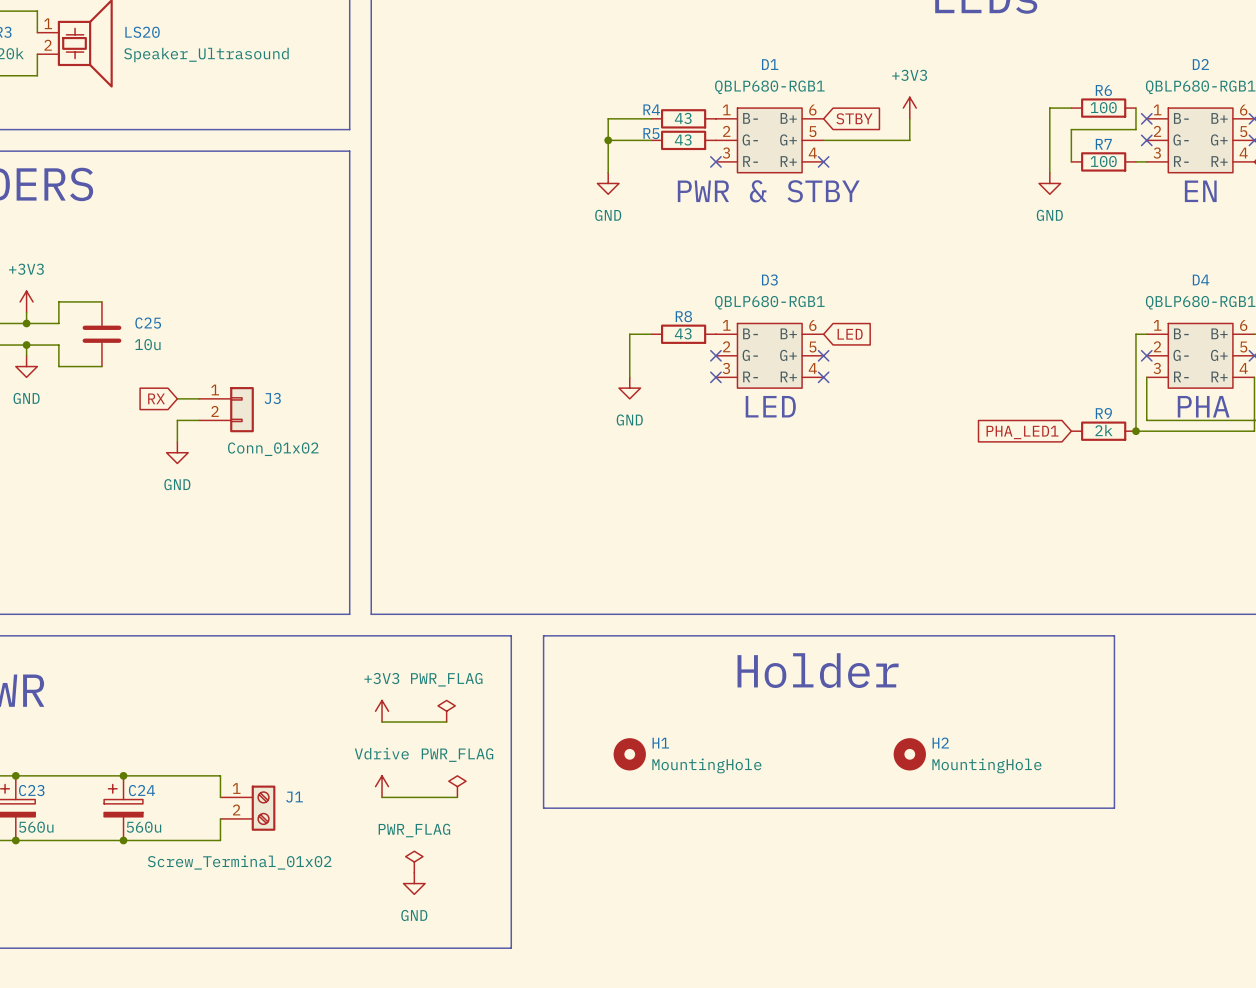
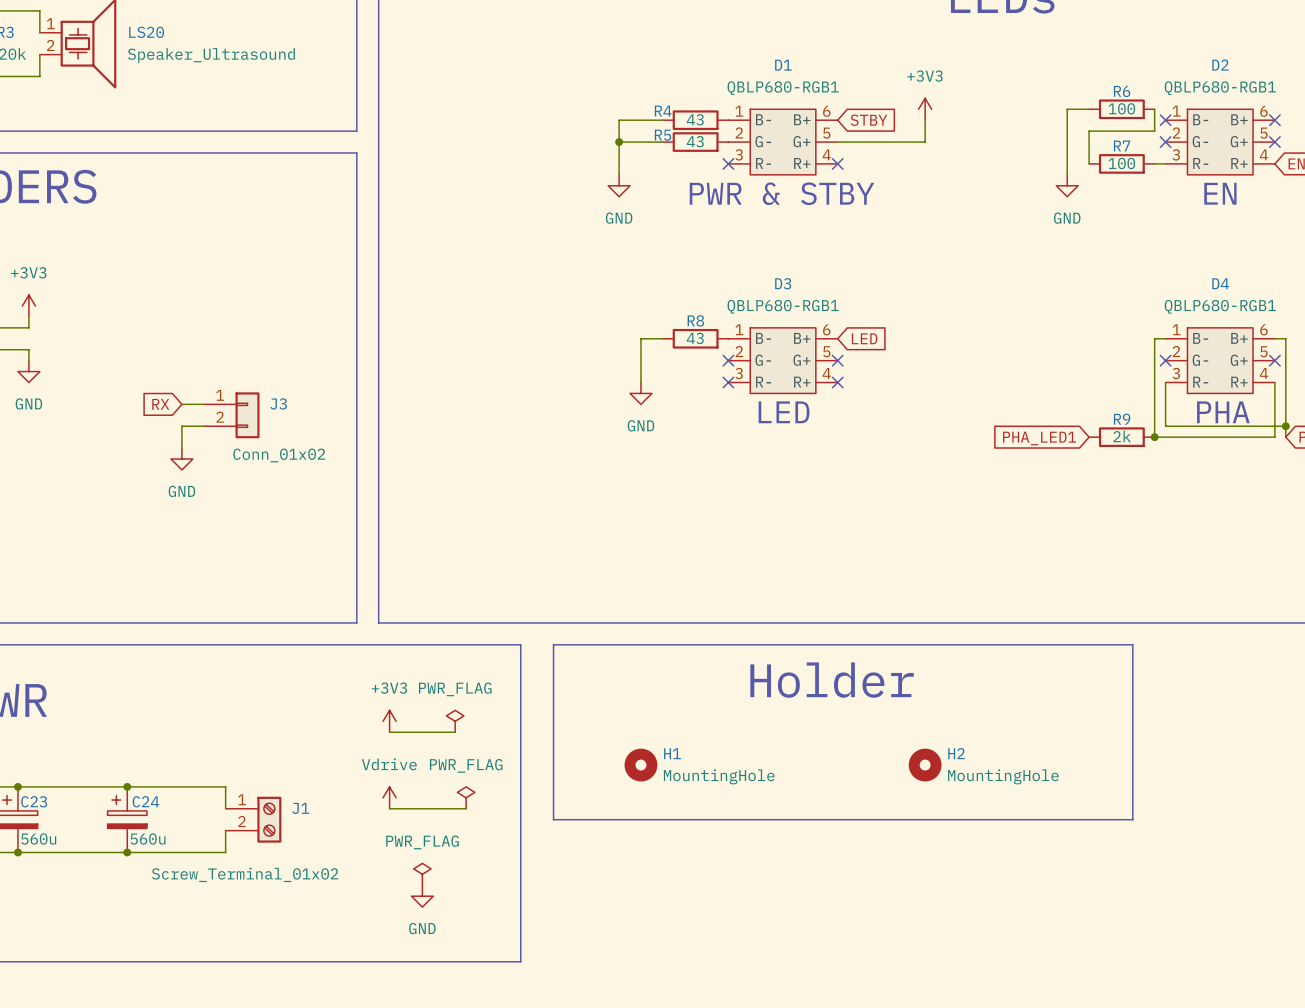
wire: (101, 301) (58, 301) (58, 323) (26, 323) -> none
junction: (26, 323) -> none
C25: 10u (101, 334) -> none
wire: (26, 345) (58, 345) (58, 366) (101, 366) -> none
junction: (26, 345) -> none

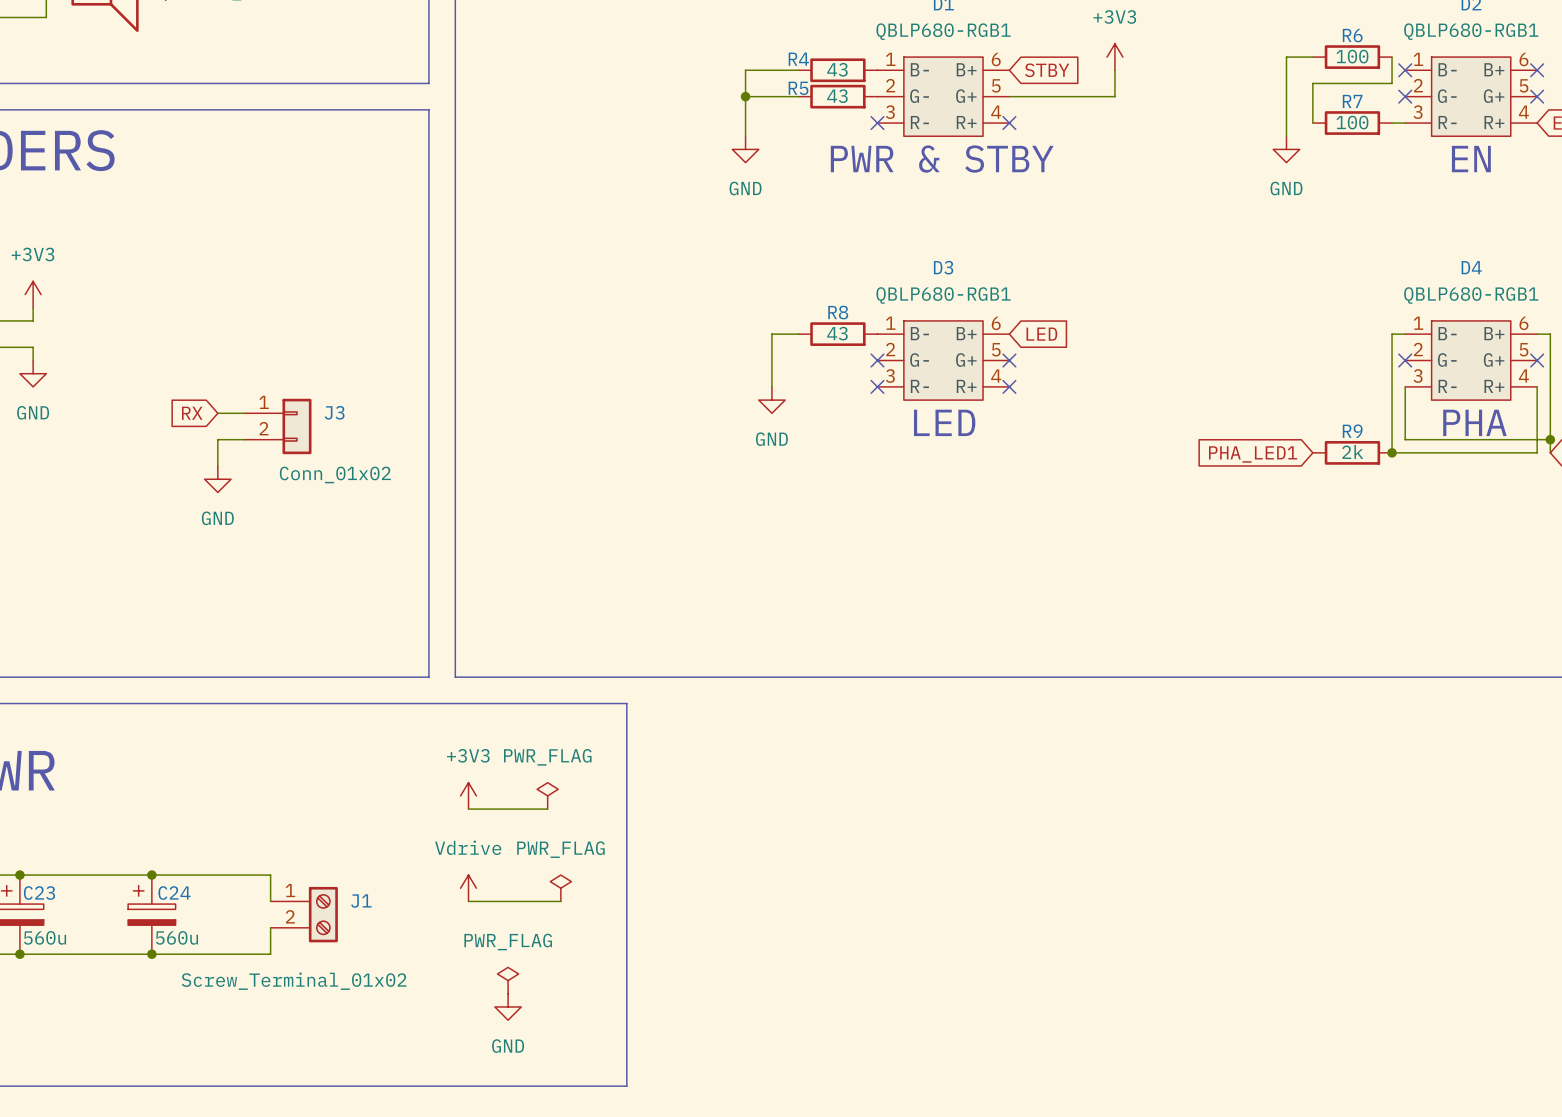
line: (553, 644) (1132, 644) (1132, 819) (553, 819) (553, 644) -> none
text: Holder (832, 680) -> none
H1: MountingHole (640, 765) -> none
H2: MountingHole (925, 765) -> none

